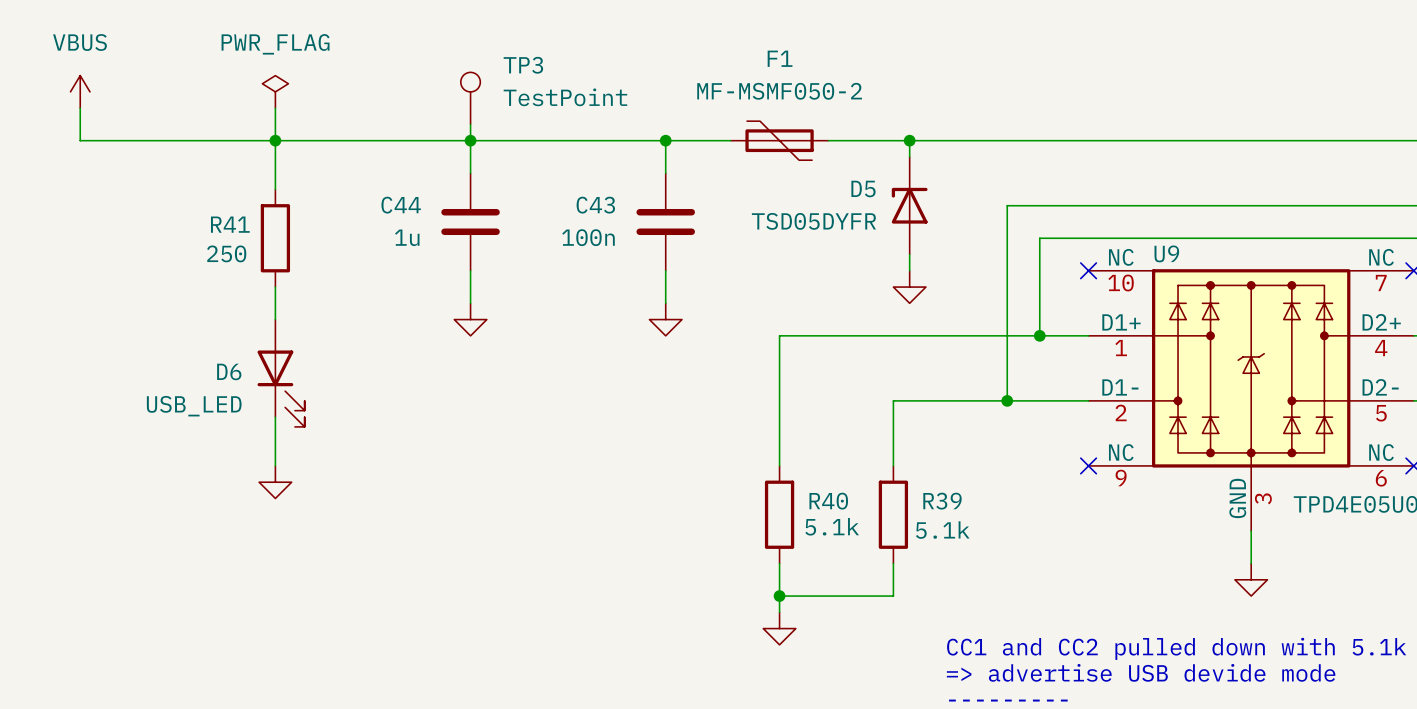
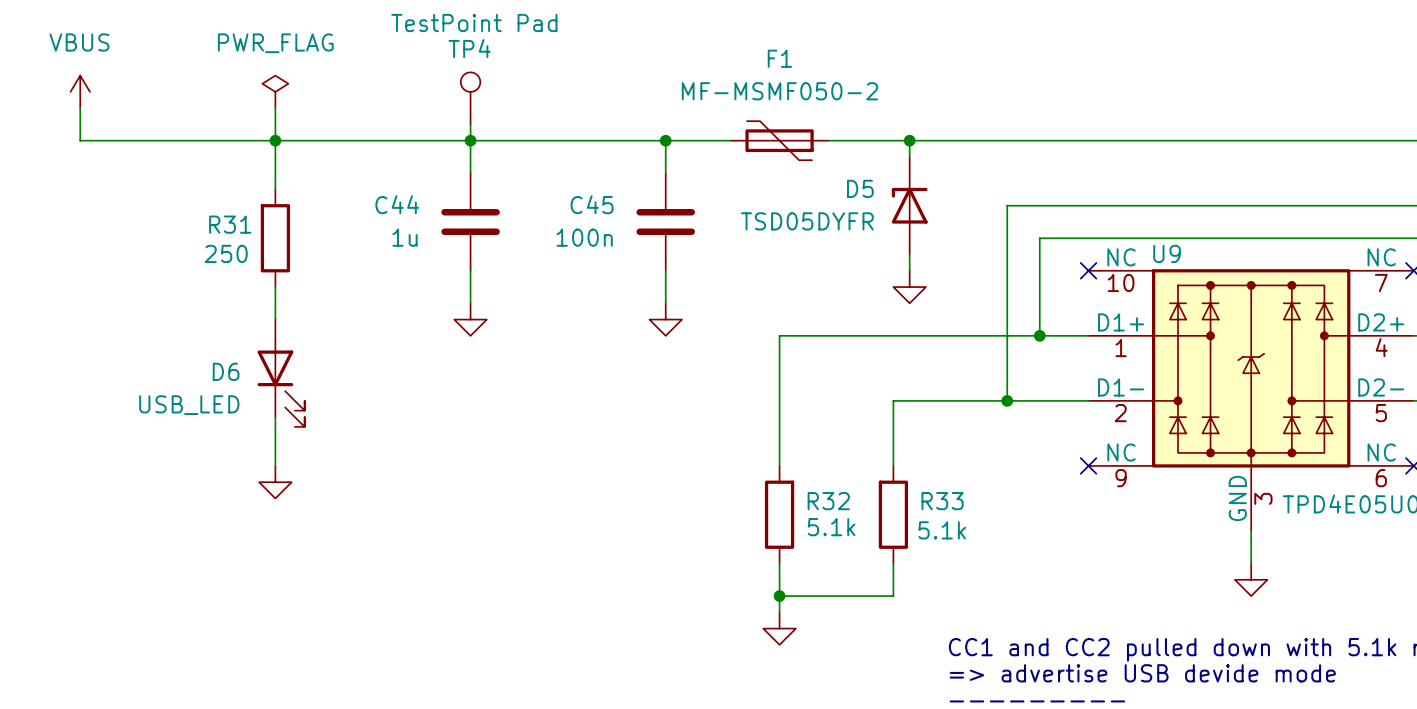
TP3 name: TP3 (523, 65) -> TP4 (469, 48)
TP3 value: TestPoint (565, 97) -> TestPoint Pad (474, 22)
C43 name: C43 (595, 205) -> C45 (592, 204)
R41 name: R41 (230, 224) -> R31 (230, 224)
R40 name: R40 (828, 501) -> R32 (828, 501)
R39 name: R39 (942, 501) -> R33 (942, 501)

